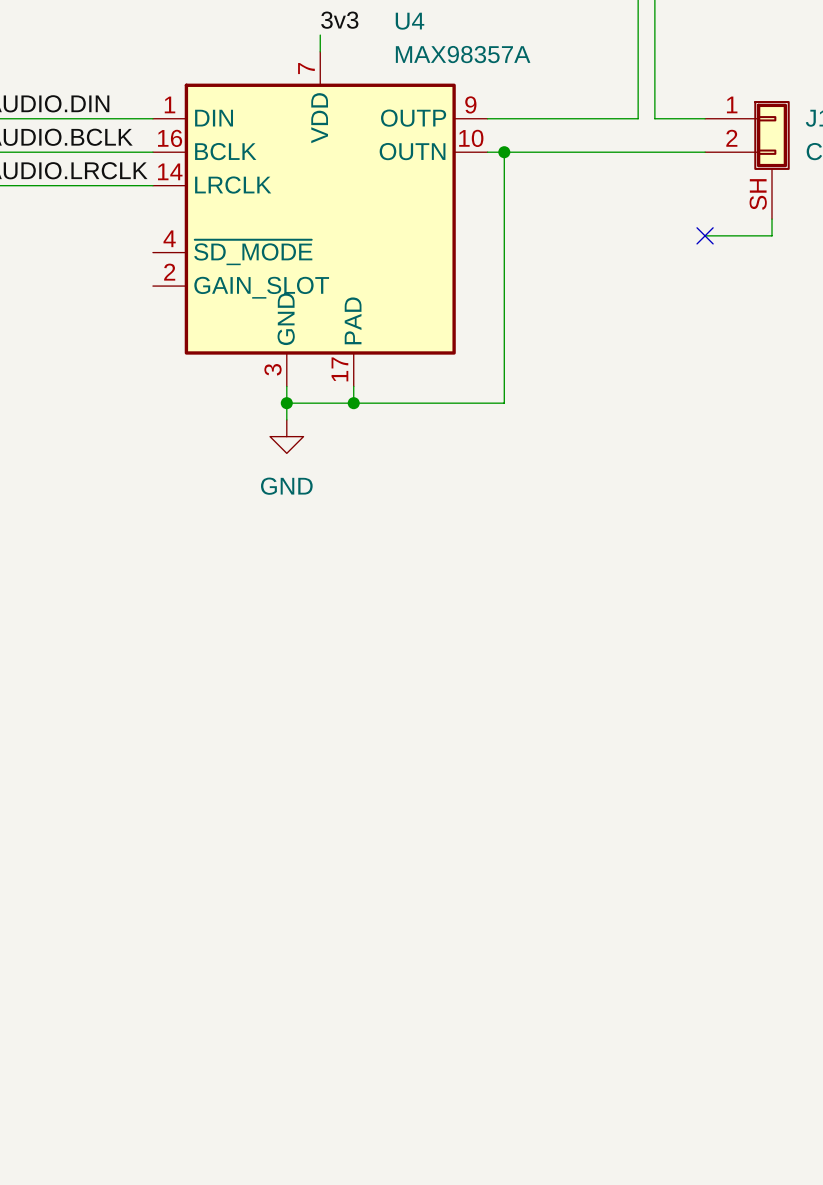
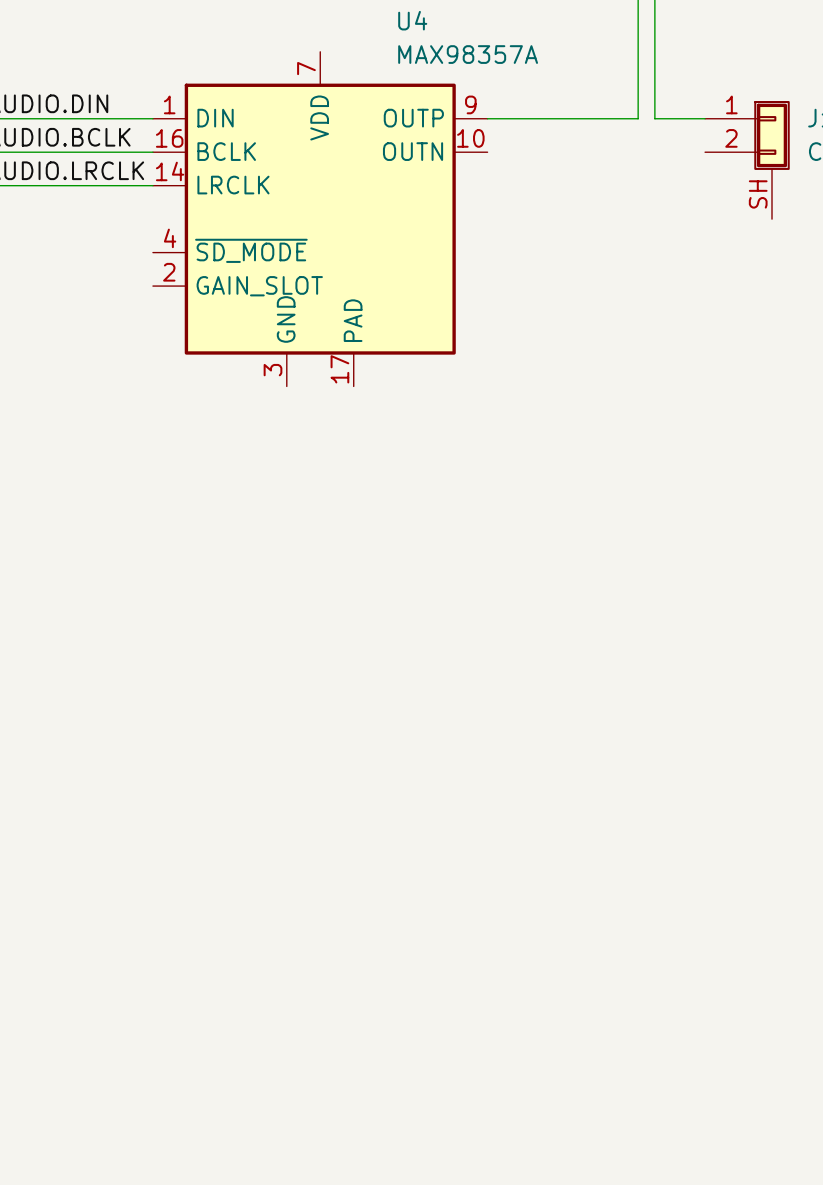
label: 3v3 (339, 20) -> none
wire: (320, 35) (320, 51) -> none
wire: (487, 152) (705, 152) -> none
wire: (504, 152) (504, 403) (286, 403) -> none
junction: (504, 152) -> none
wire: (772, 219) (772, 235) (705, 235) -> none
no-connect mark: (705, 235) -> none
wire: (286, 386) (286, 419) -> none
wire: (353, 386) (353, 403) -> none
junction: (286, 403) -> none
junction: (353, 403) -> none
power symbol: GND (286, 436) -> none

